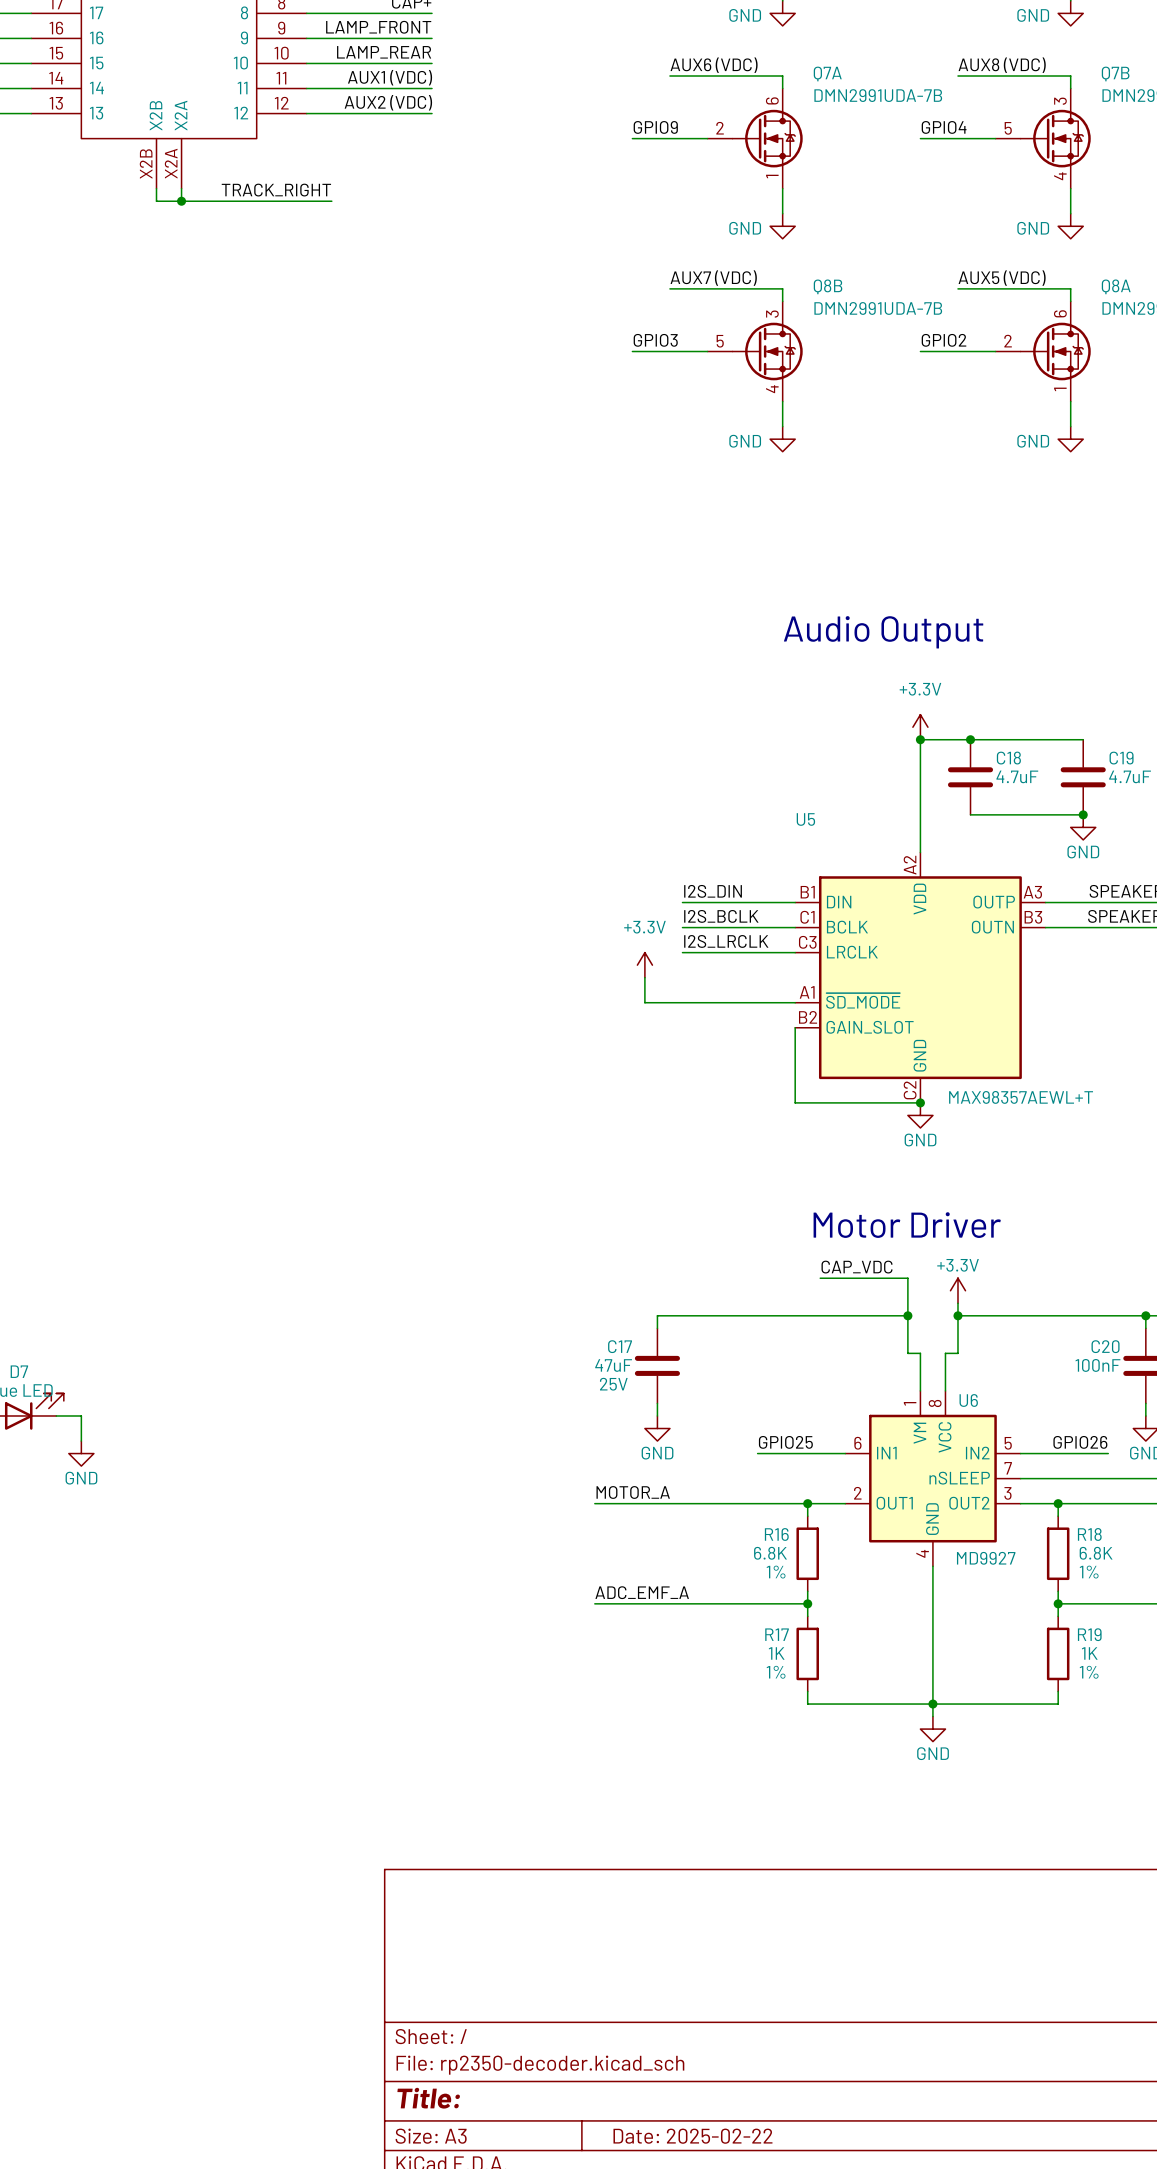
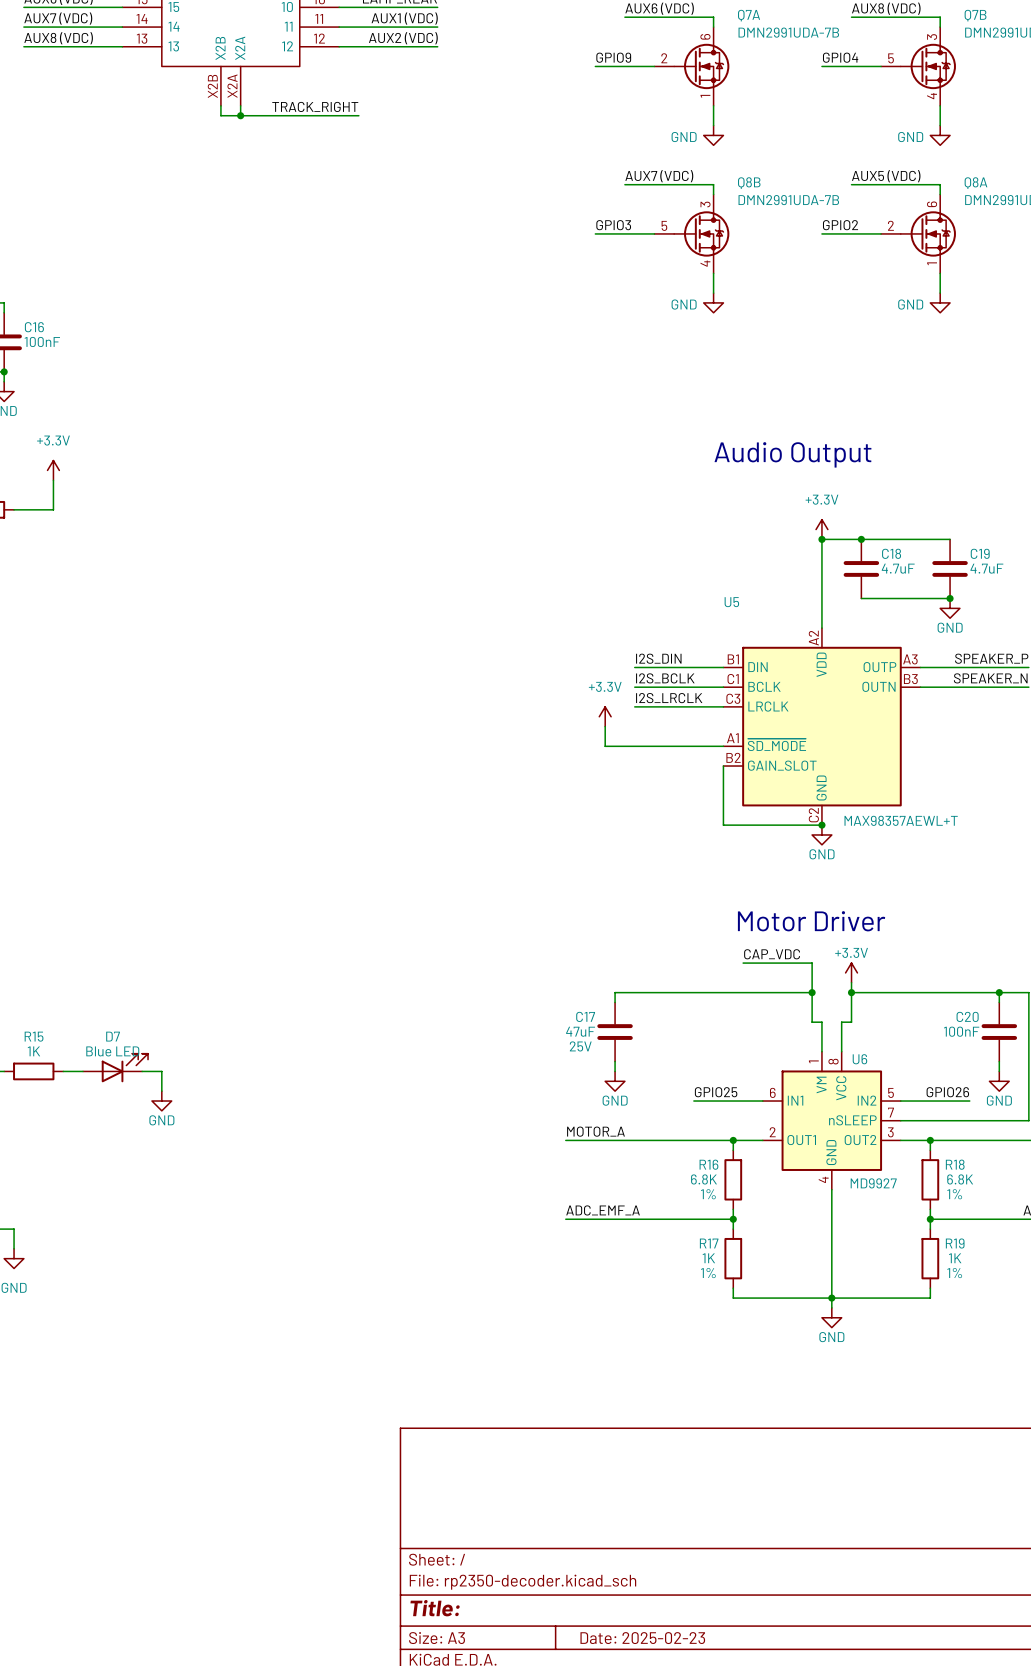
title block: Date: 2025-02-22 (692, 2136) -> Date: 2025-02-23 (642, 1638)

